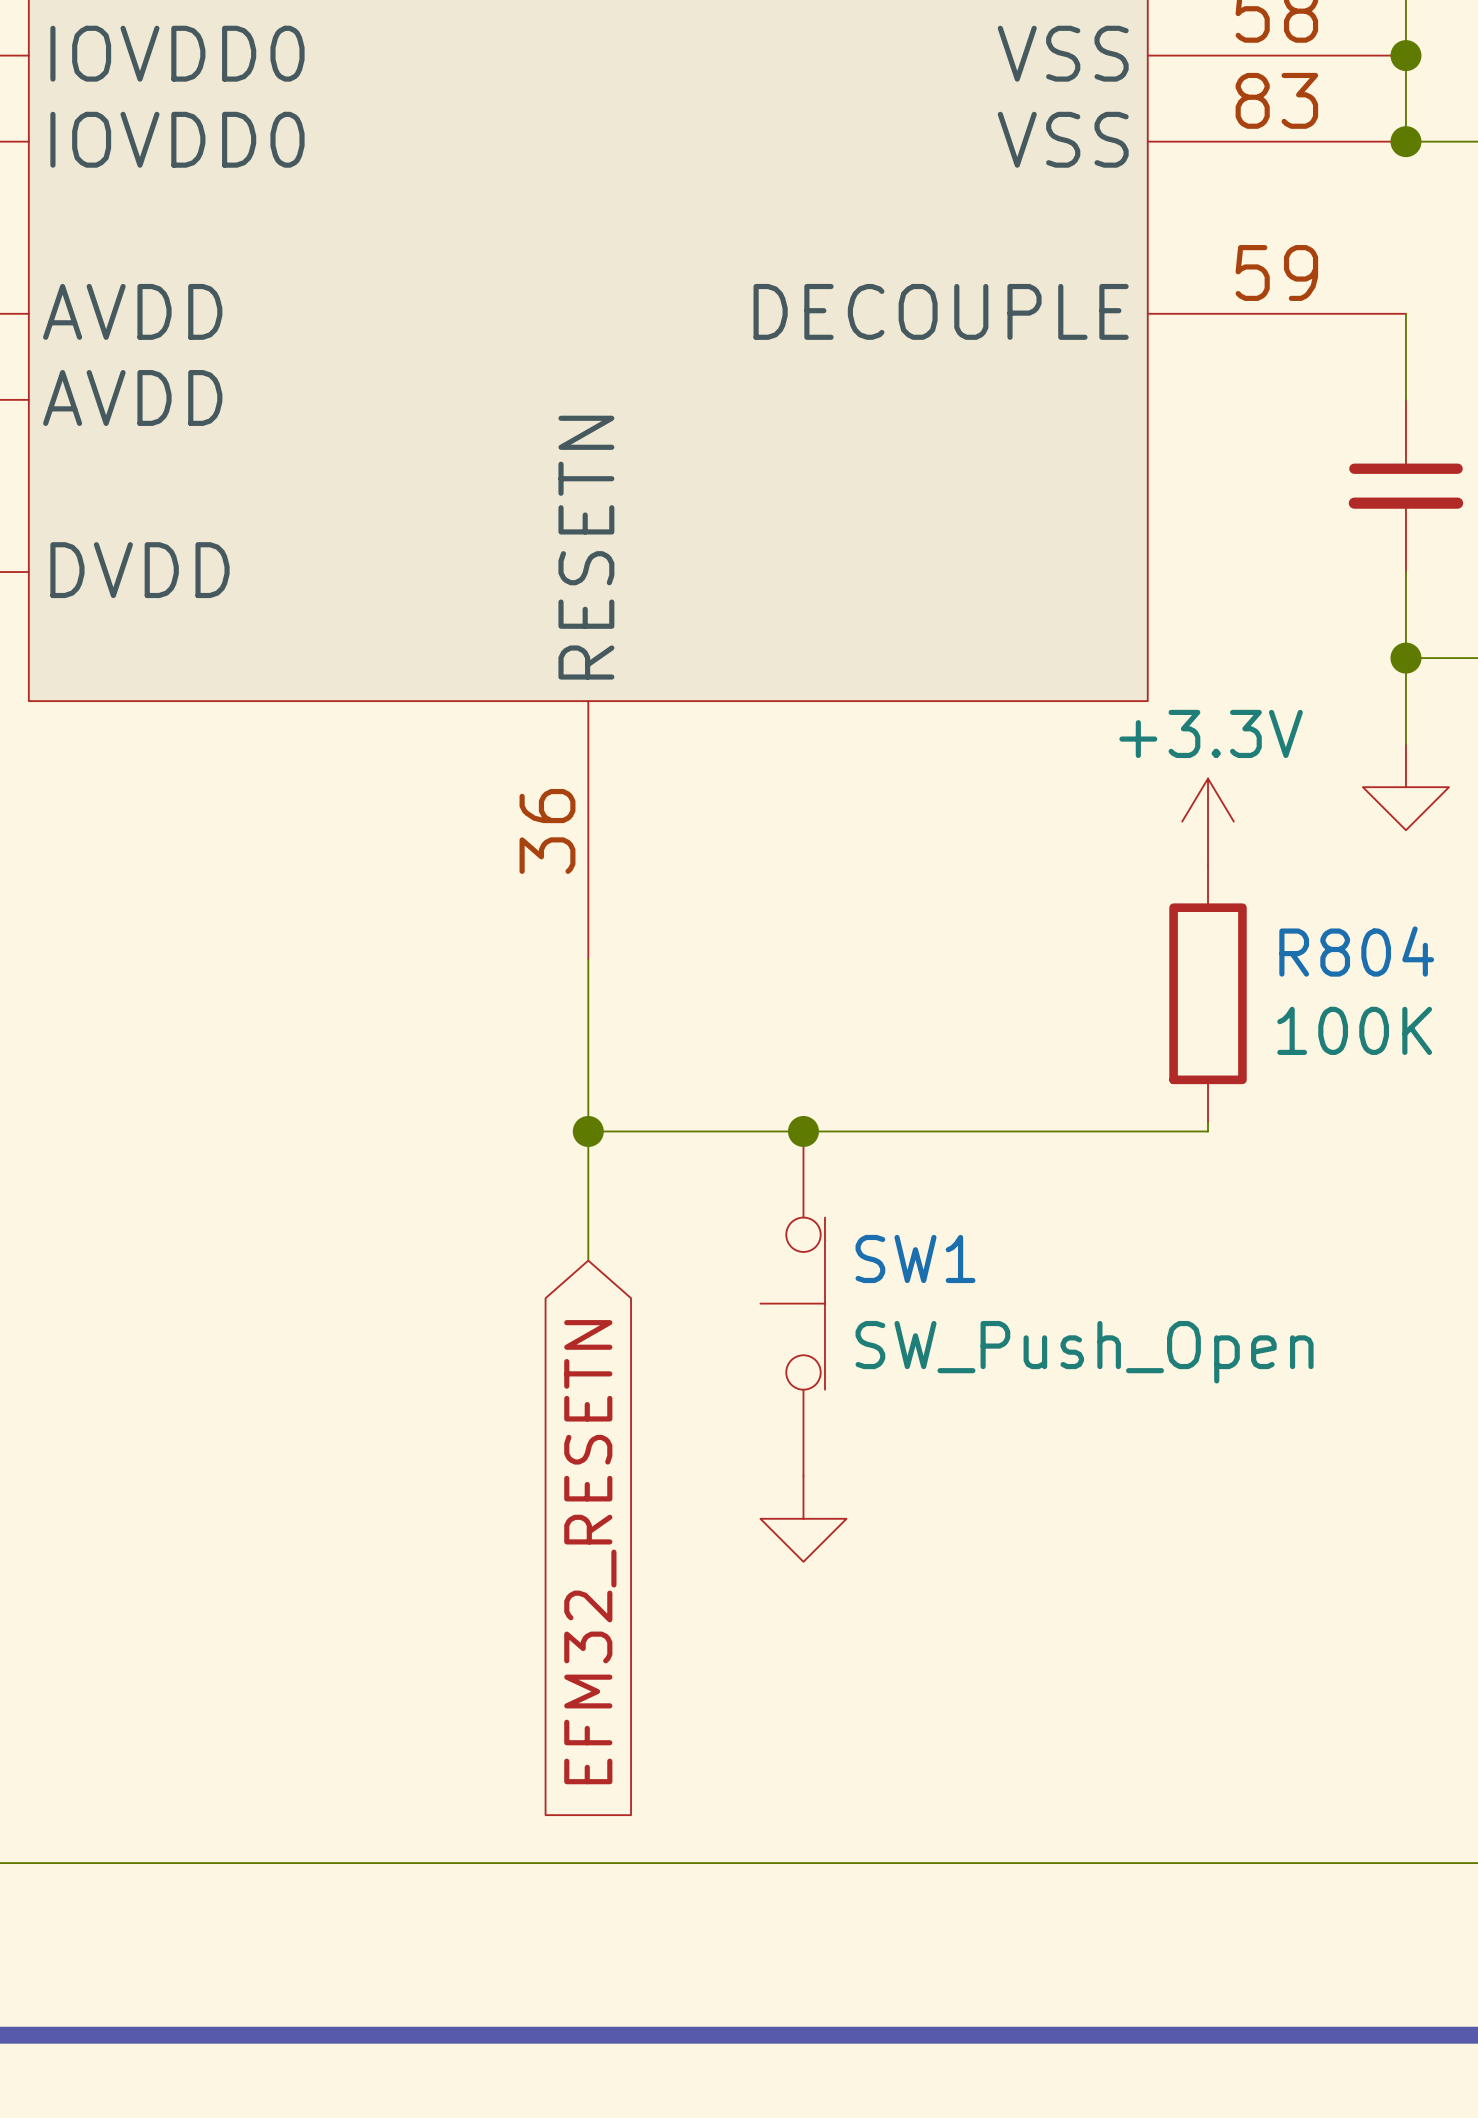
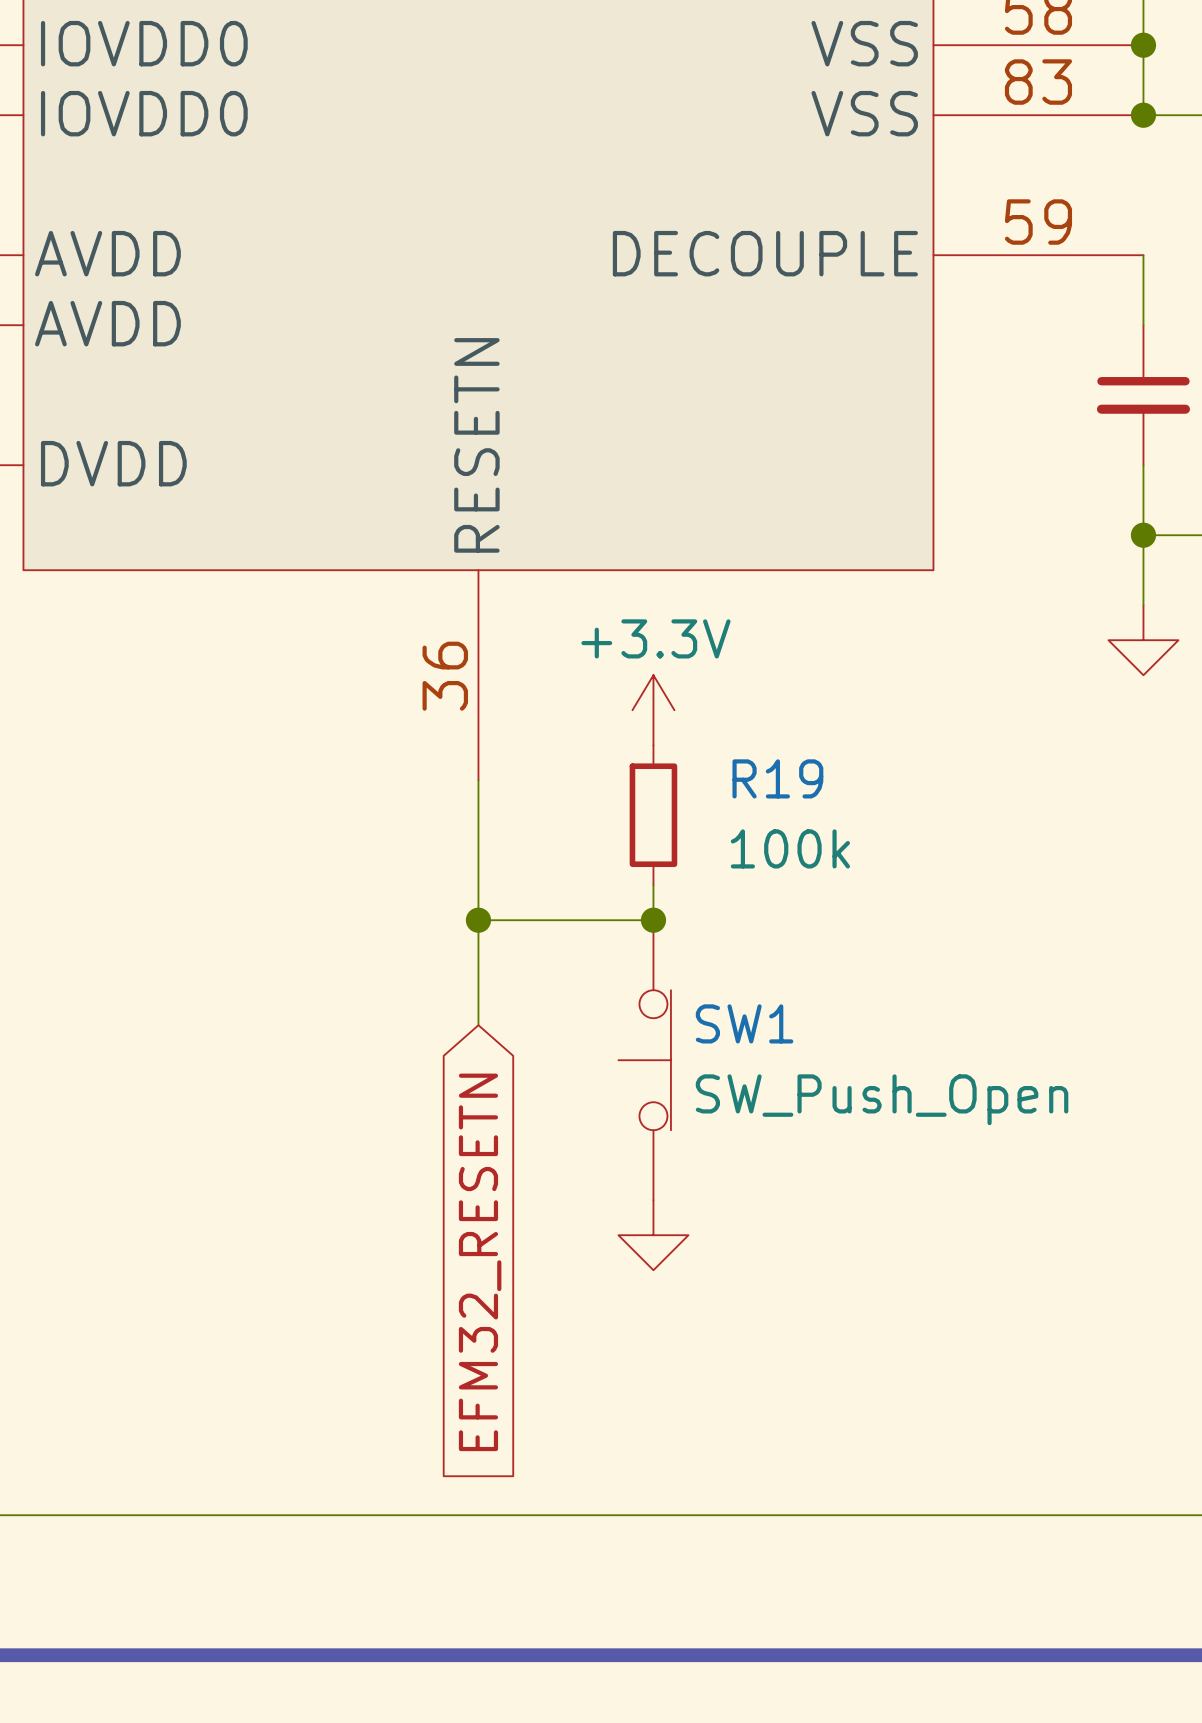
power symbol position: +3.3V (1208, 821) -> +3.3V (653, 710)
R804: 100K (1208, 993) -> none
R19: none -> 100k (653, 815)
wire: (1208, 1122) (1208, 1131) (803, 1131) -> (653, 885) (653, 920)

